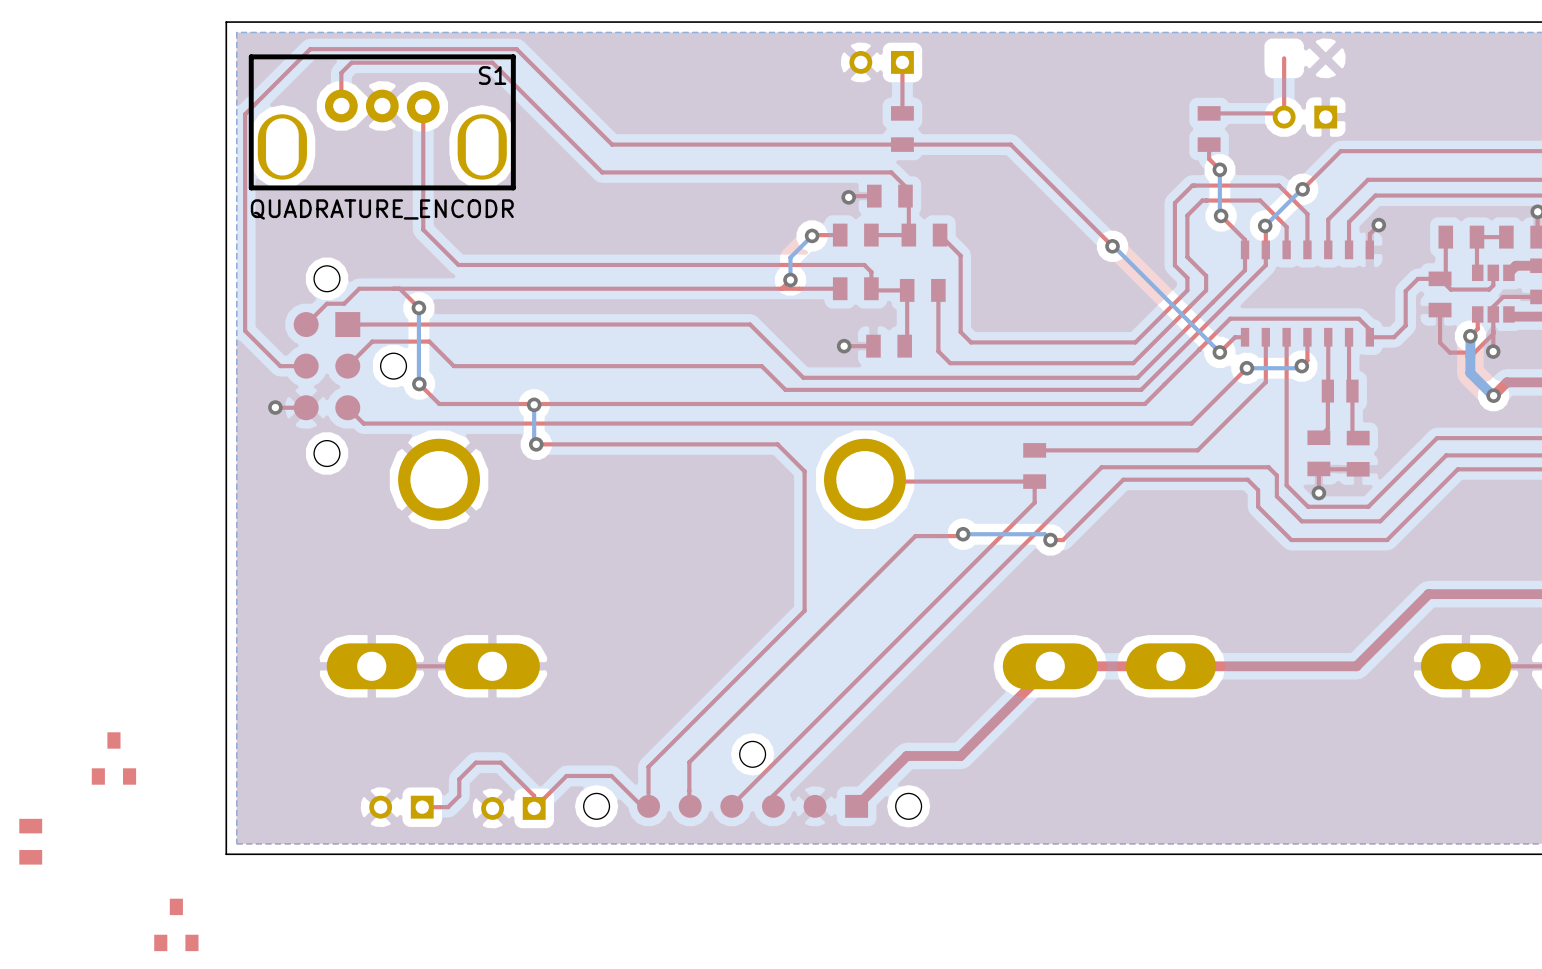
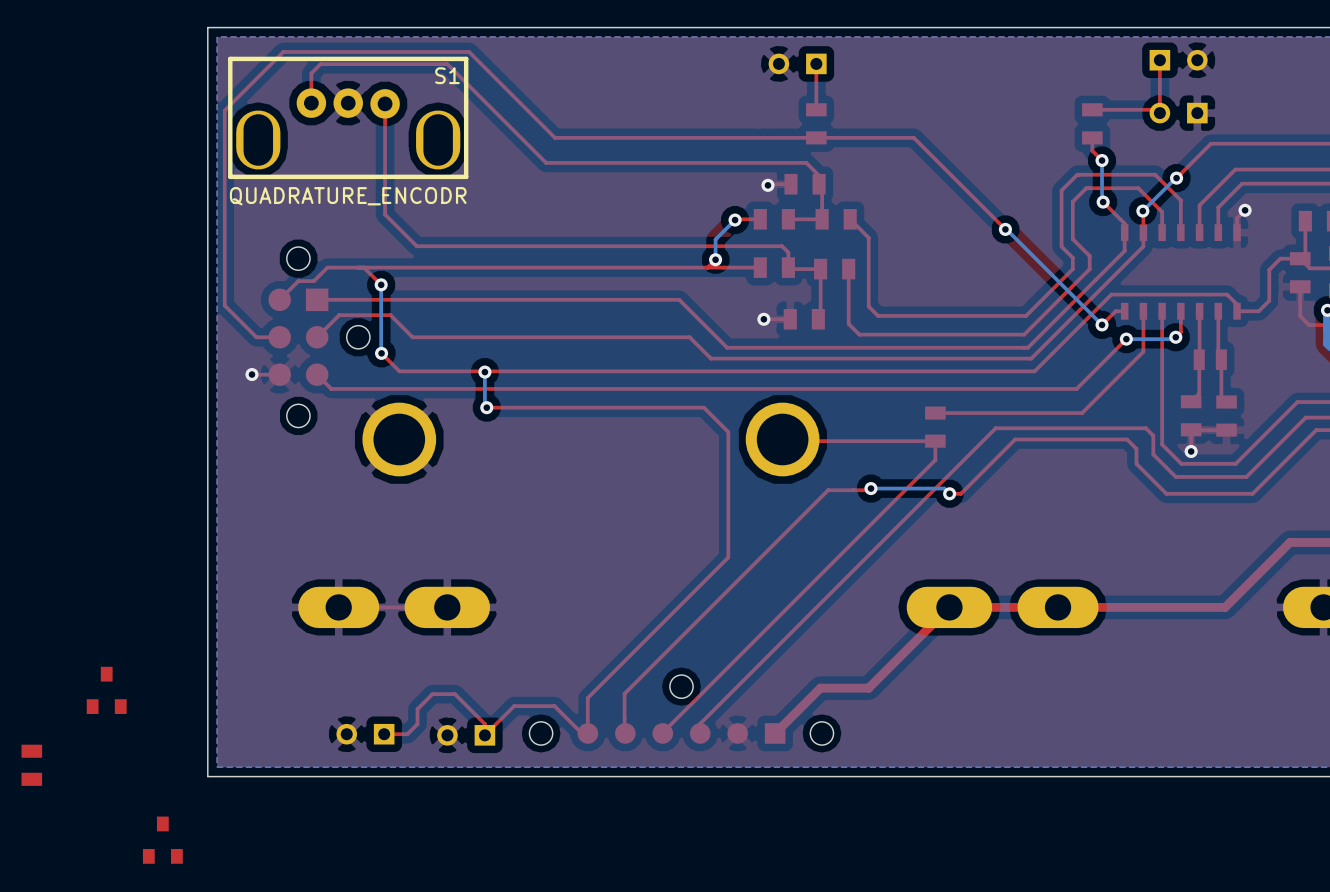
part: none -> (1178, 60)

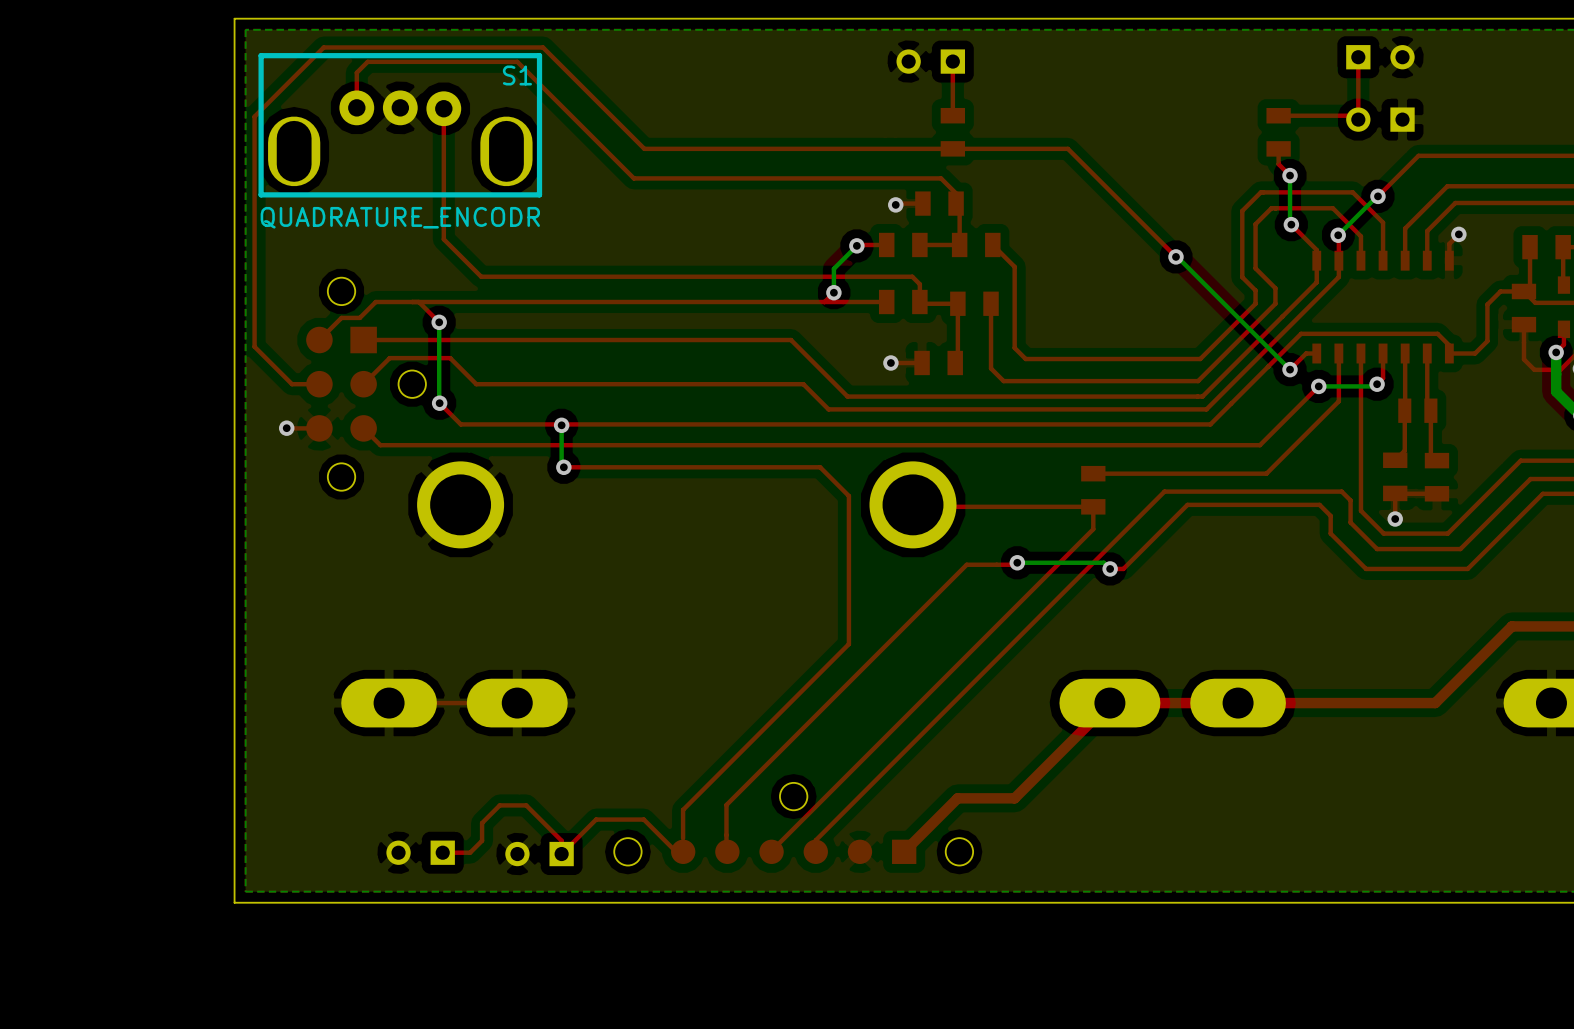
part: (106, 690) -> none
part: (31, 765) -> none
part: (162, 840) -> none

